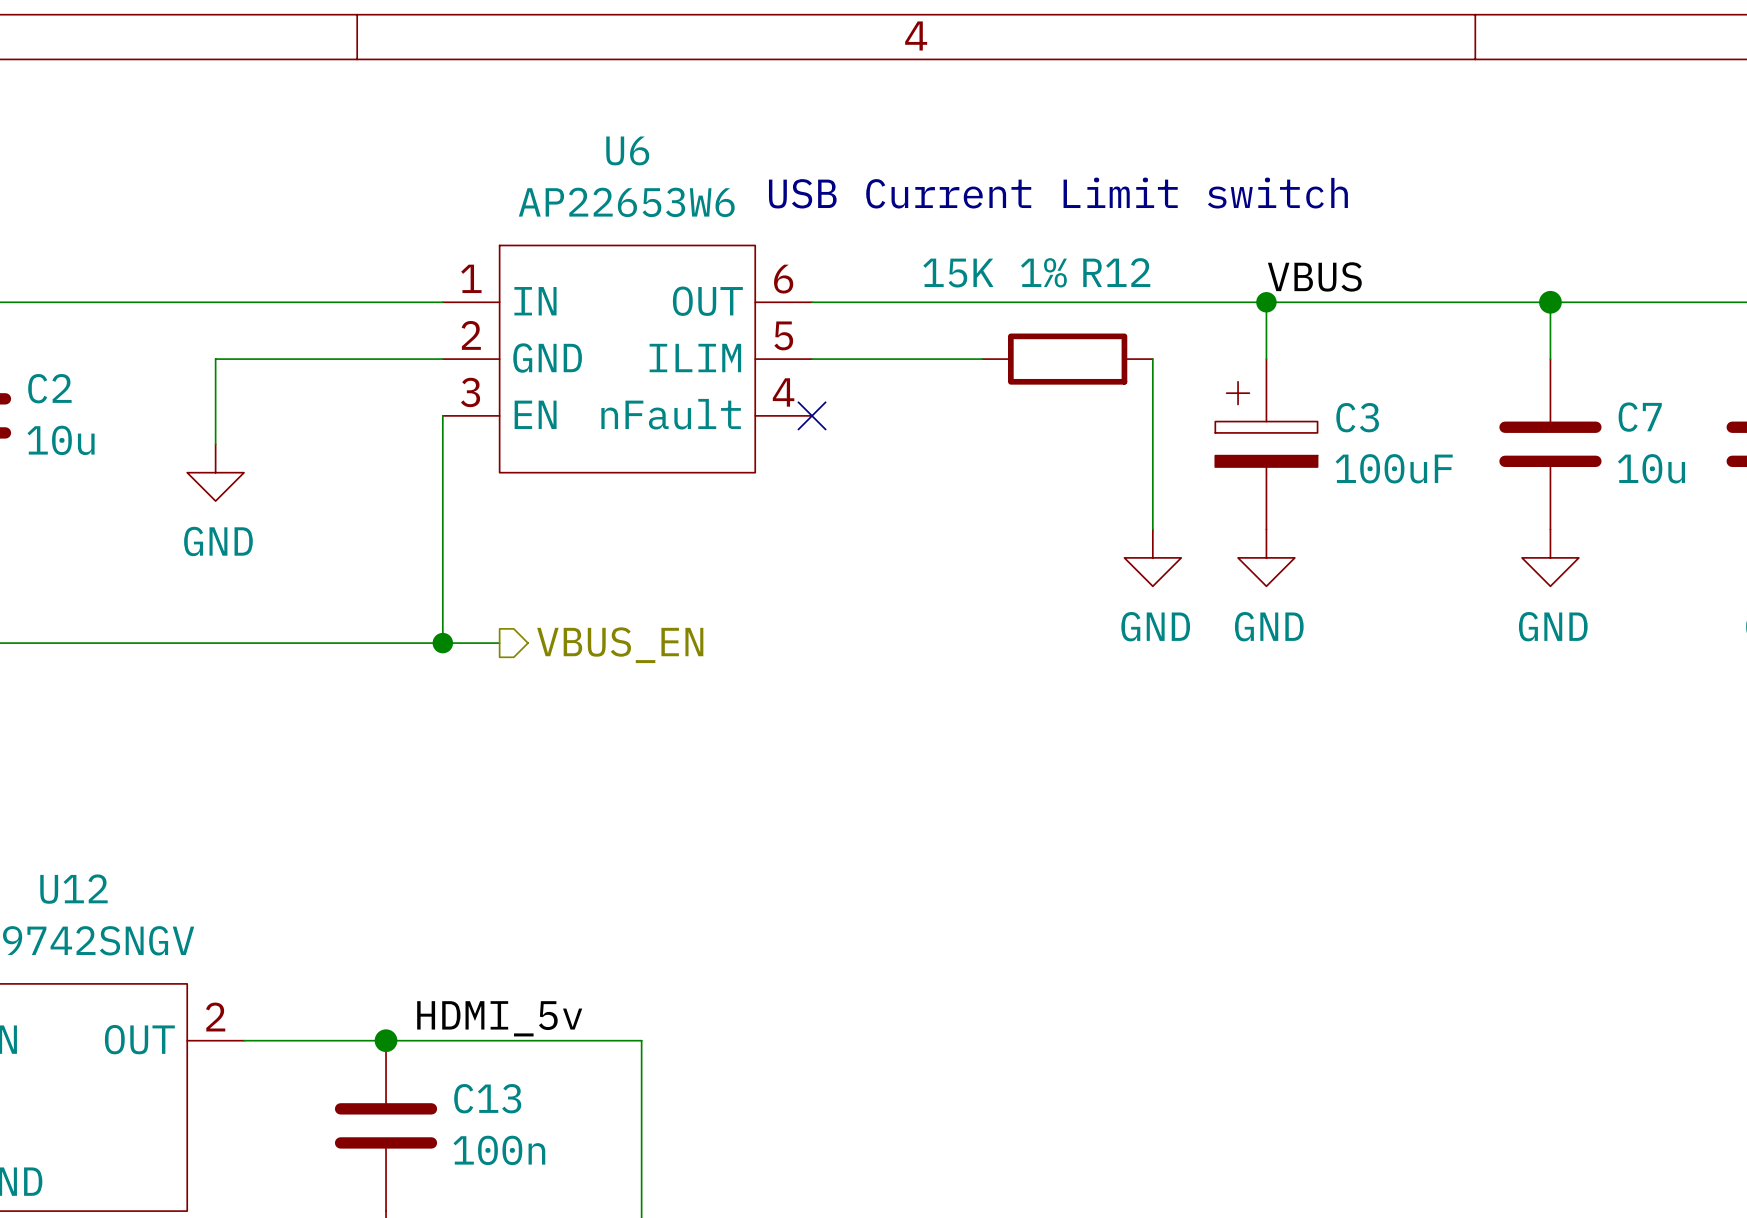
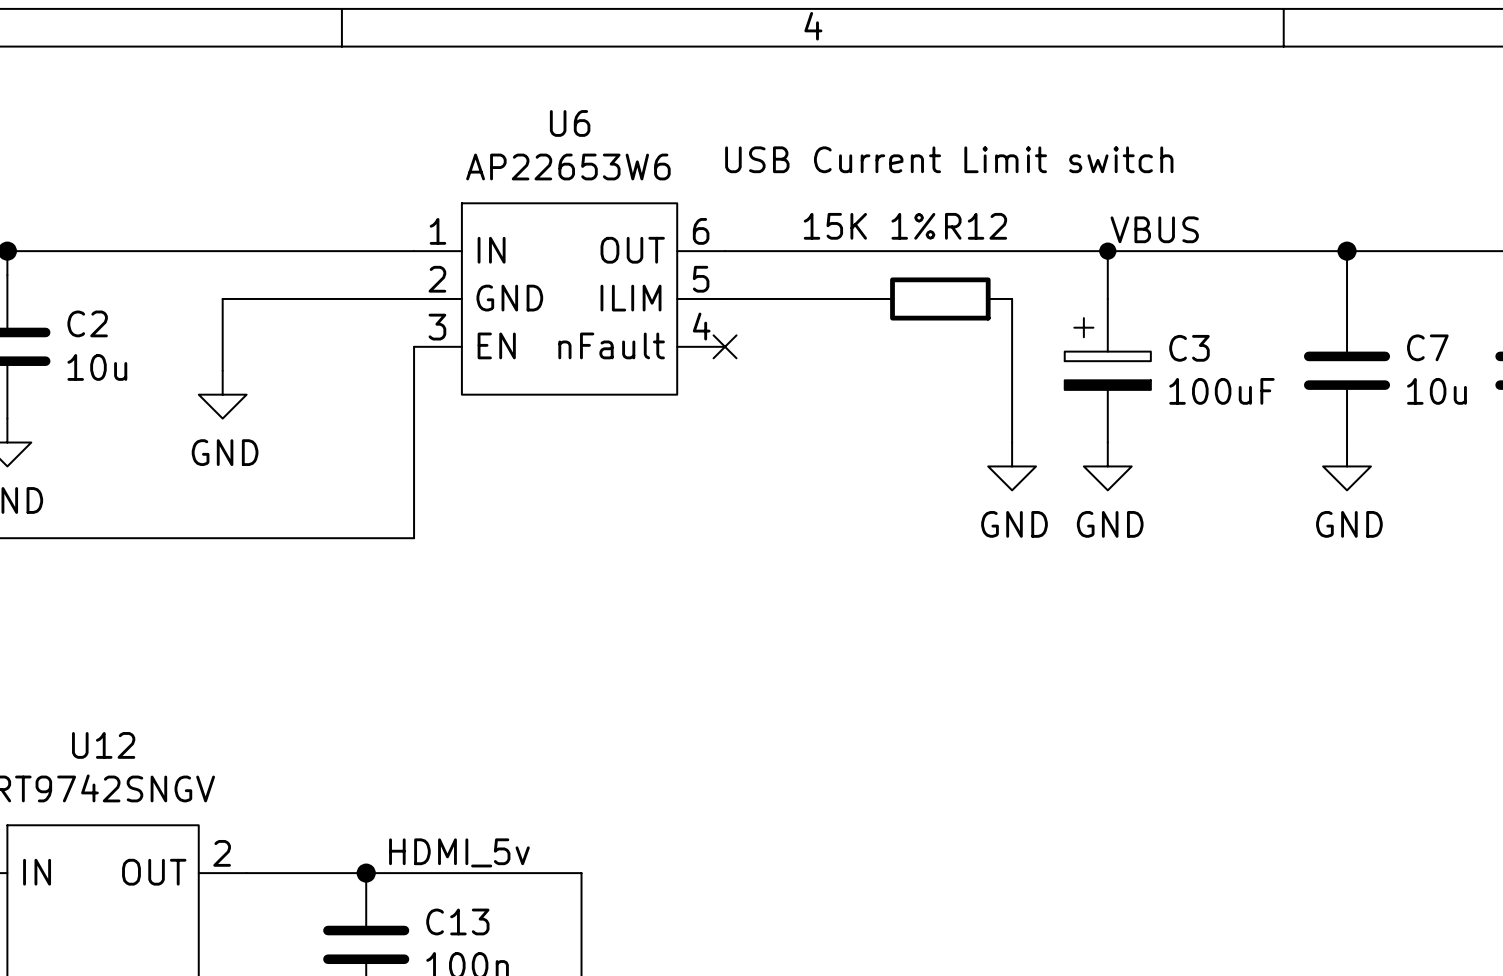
wire: (442, 643) (499, 643) -> none
junction: (442, 643) -> none
hierarchical label: VBUS_EN (620, 645) -> none

